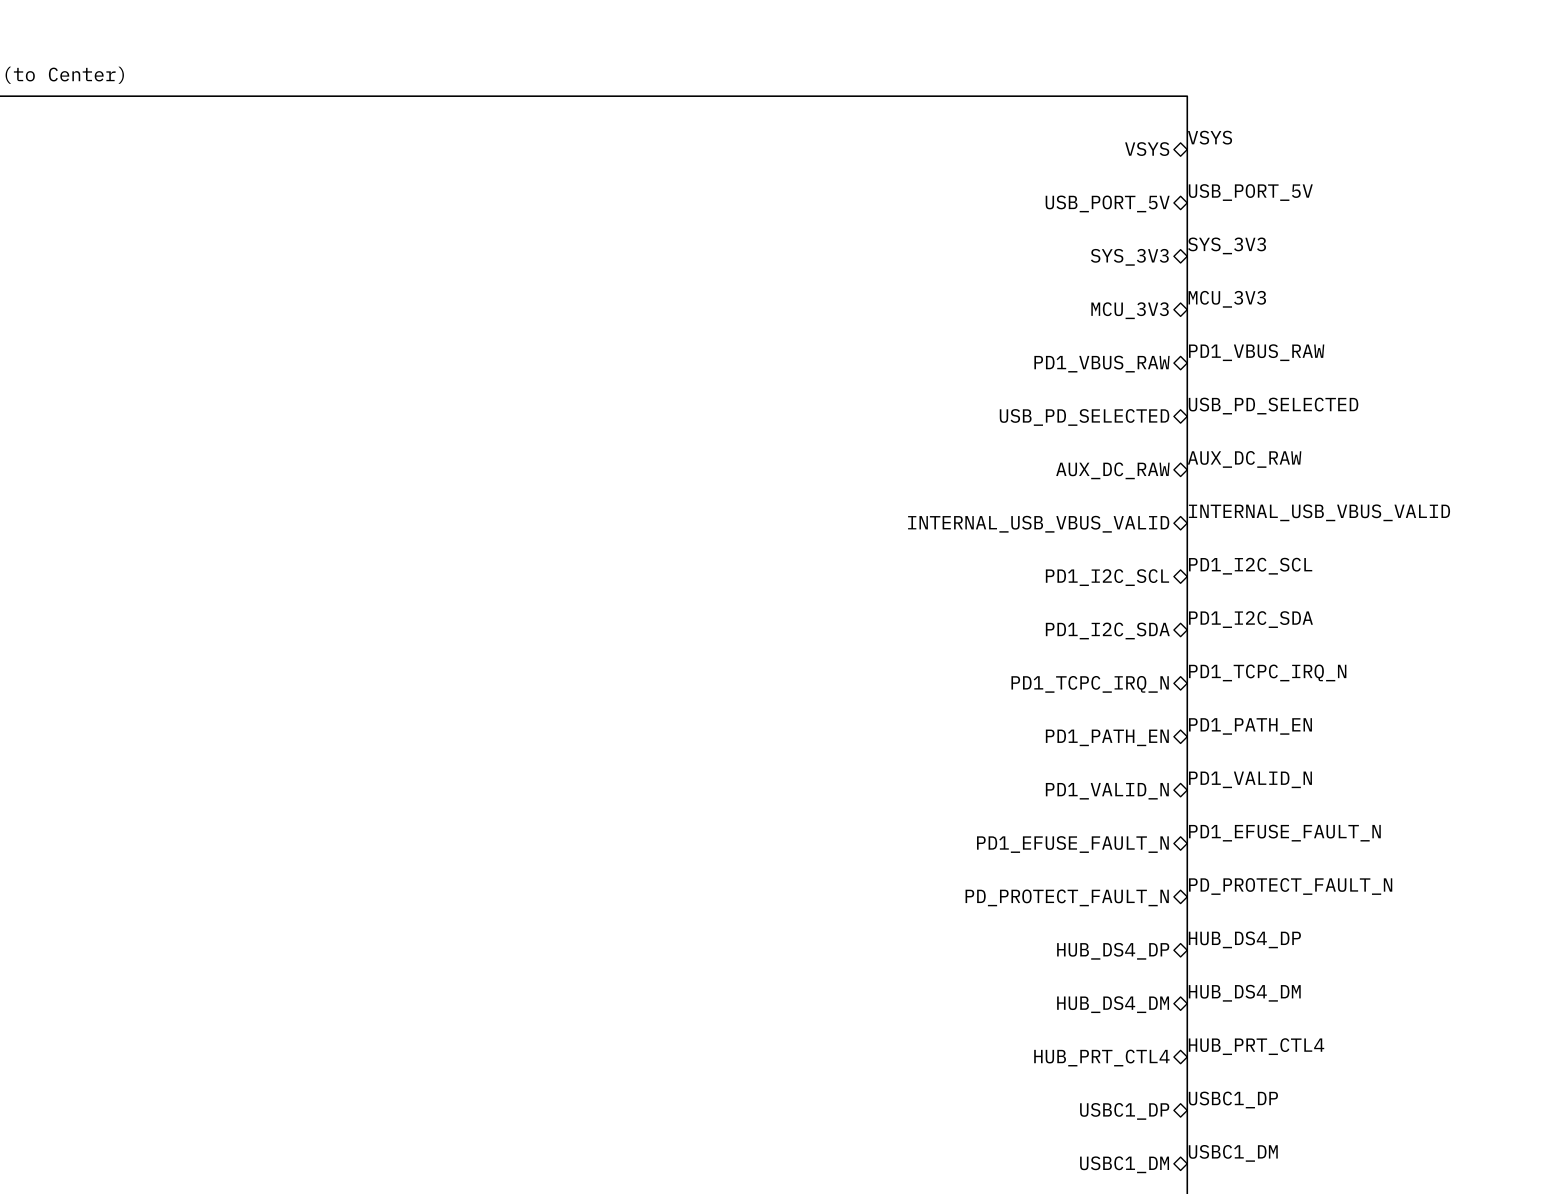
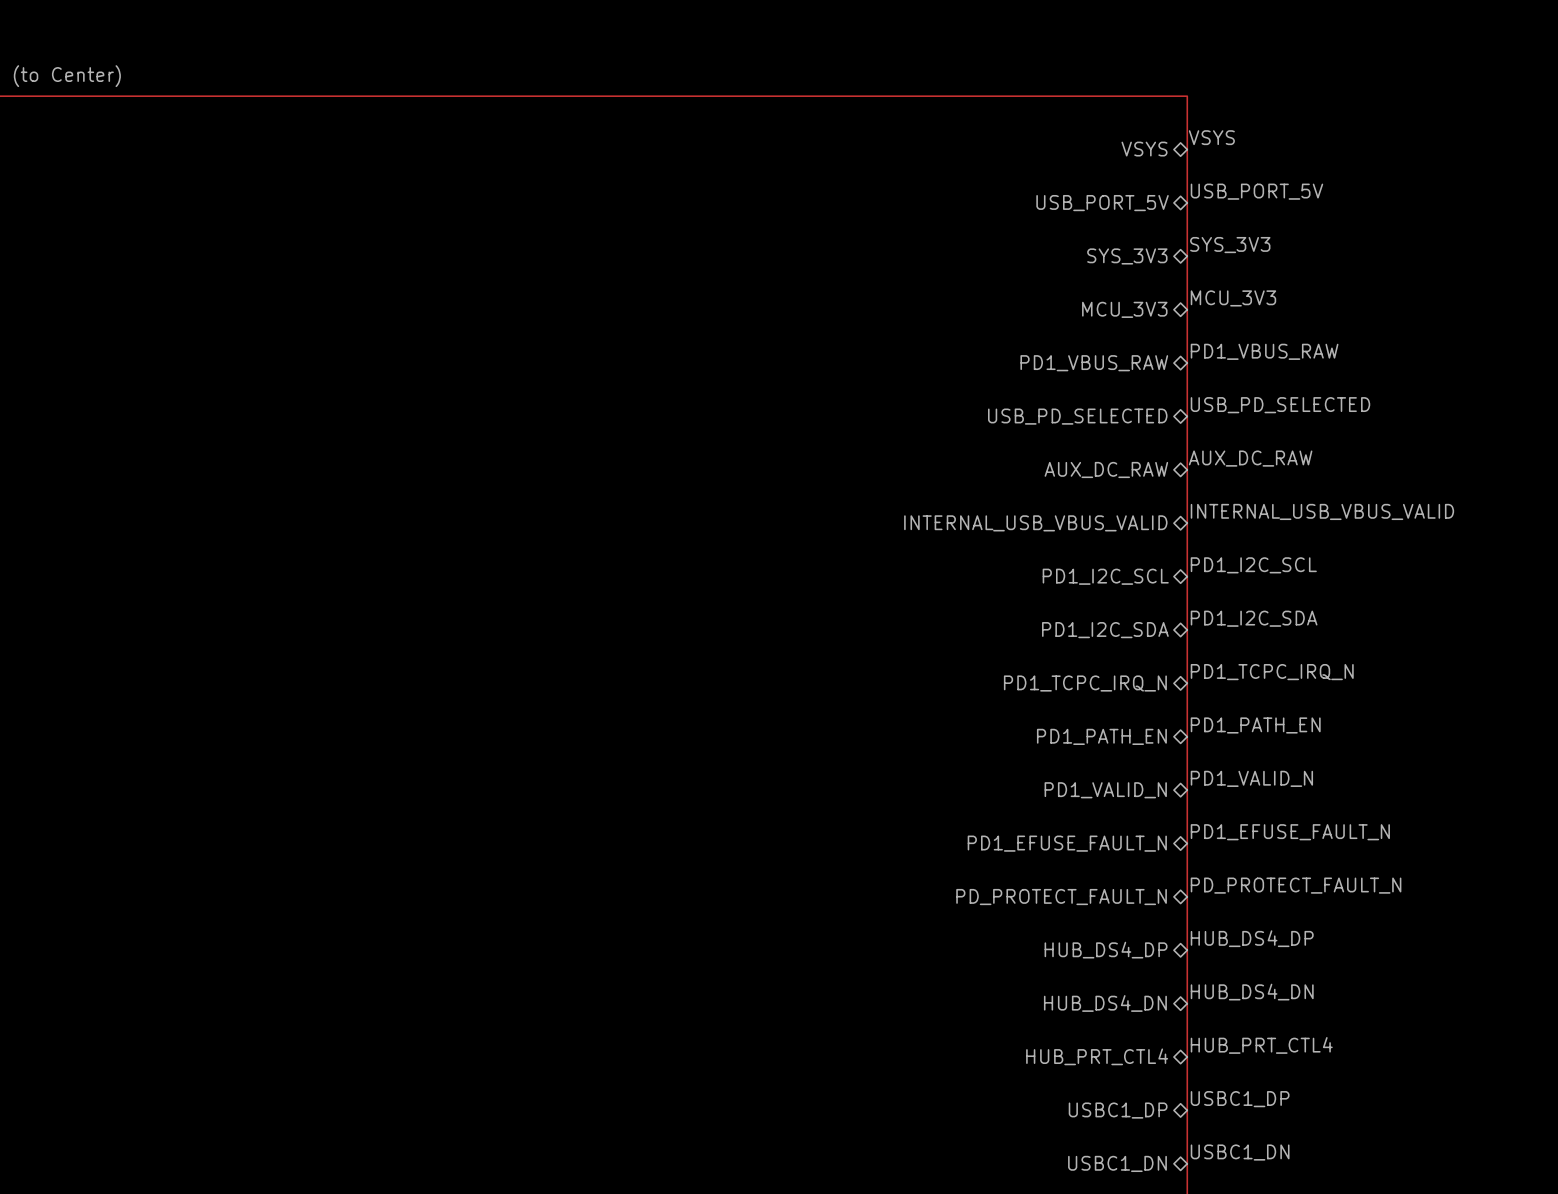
label: HUB_DS4_DM (1244, 993) -> HUB_DS4_DN (1252, 992)
sheet pin: HUB_DS4_DM (1113, 1004) -> HUB_DS4_DN (1105, 1003)
label: USBC1_DM (1233, 1153) -> USBC1_DN (1240, 1152)
sheet pin: USBC1_DM (1124, 1164) -> USBC1_DN (1117, 1163)

